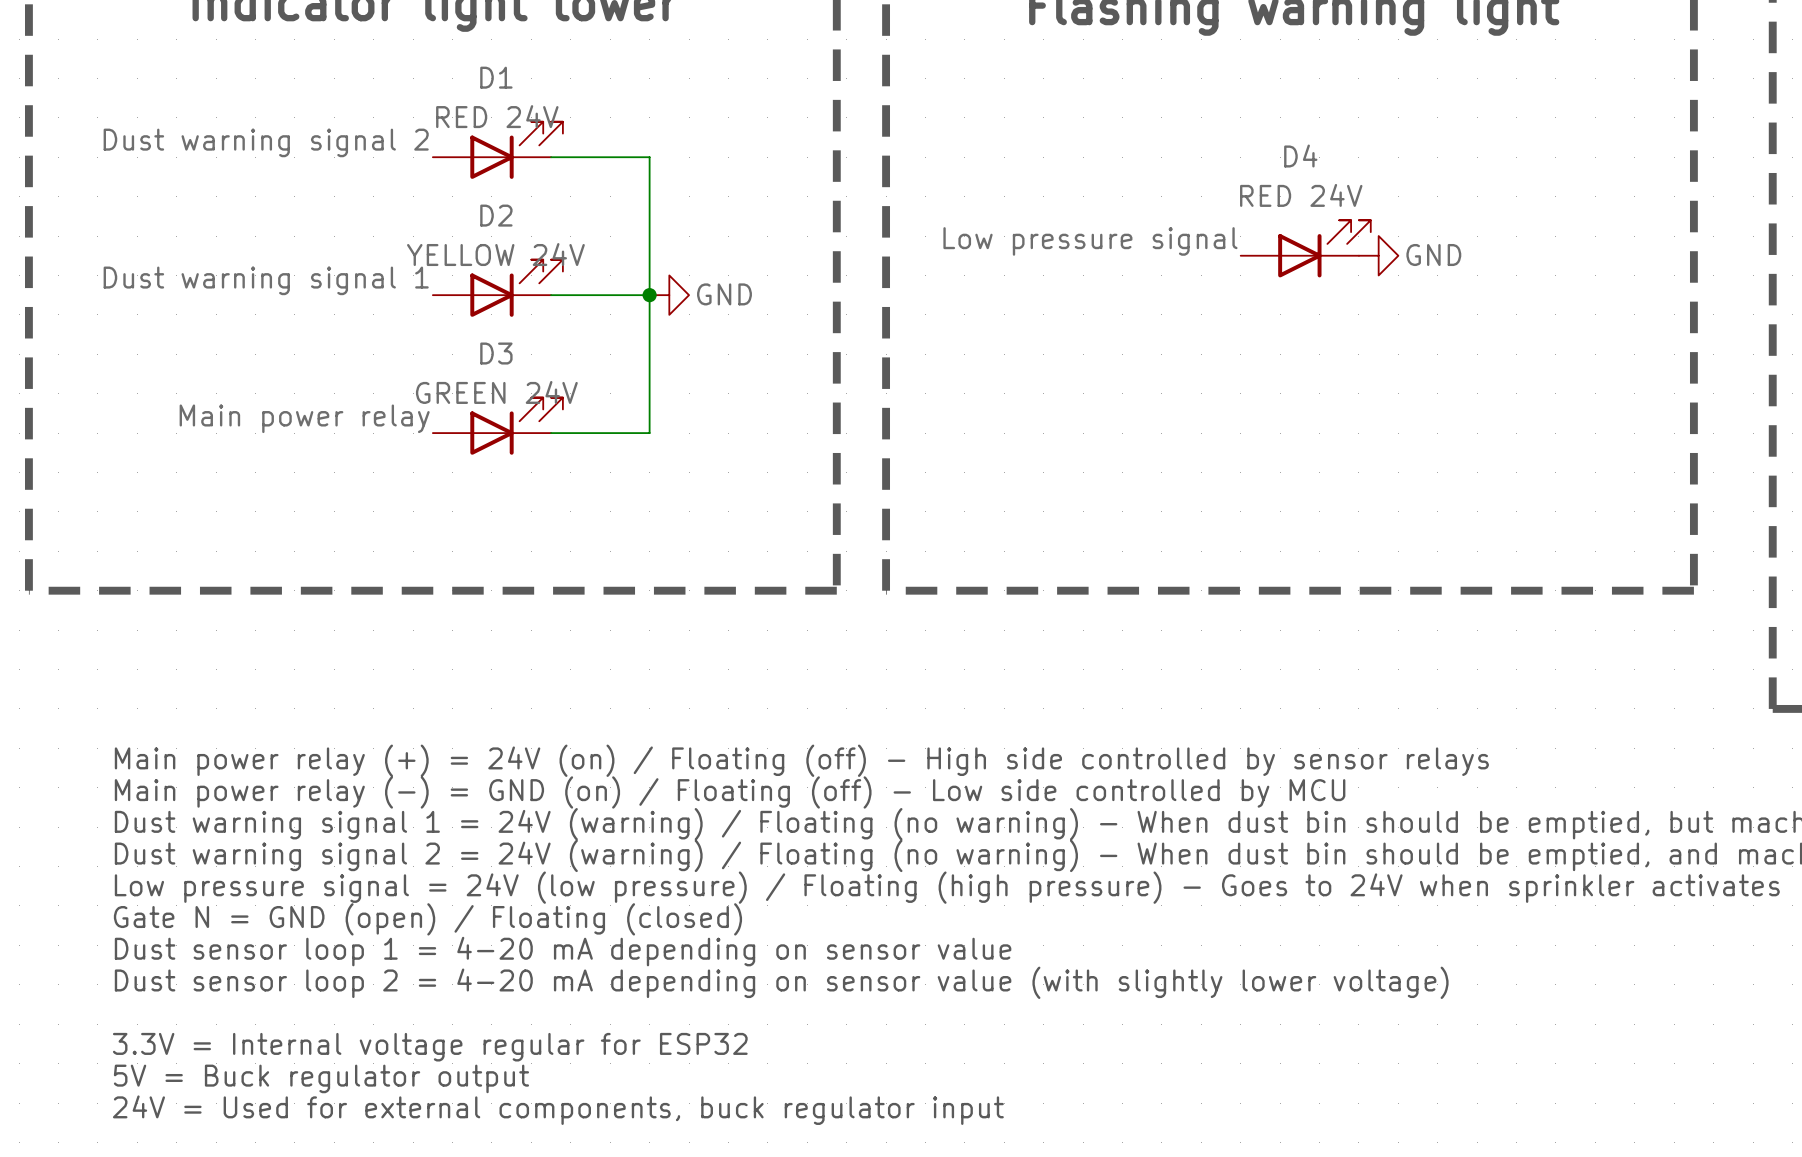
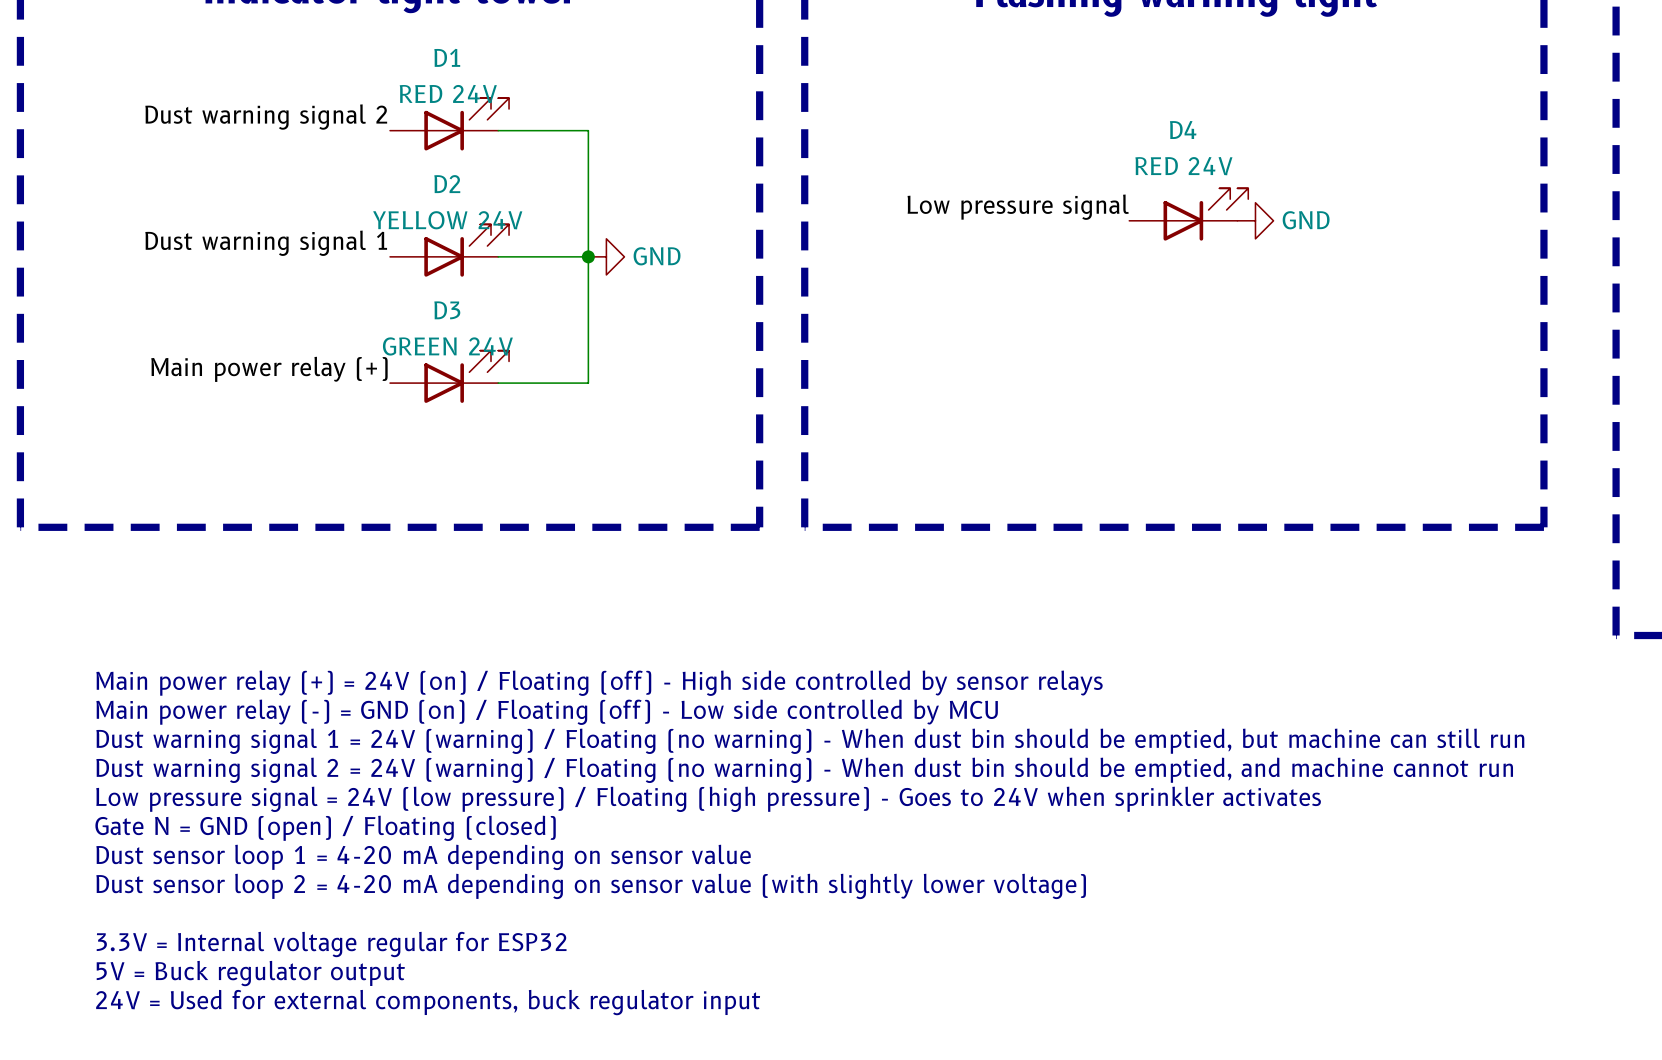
label: Main power relay (304, 418) -> Main power relay (+) (269, 369)

